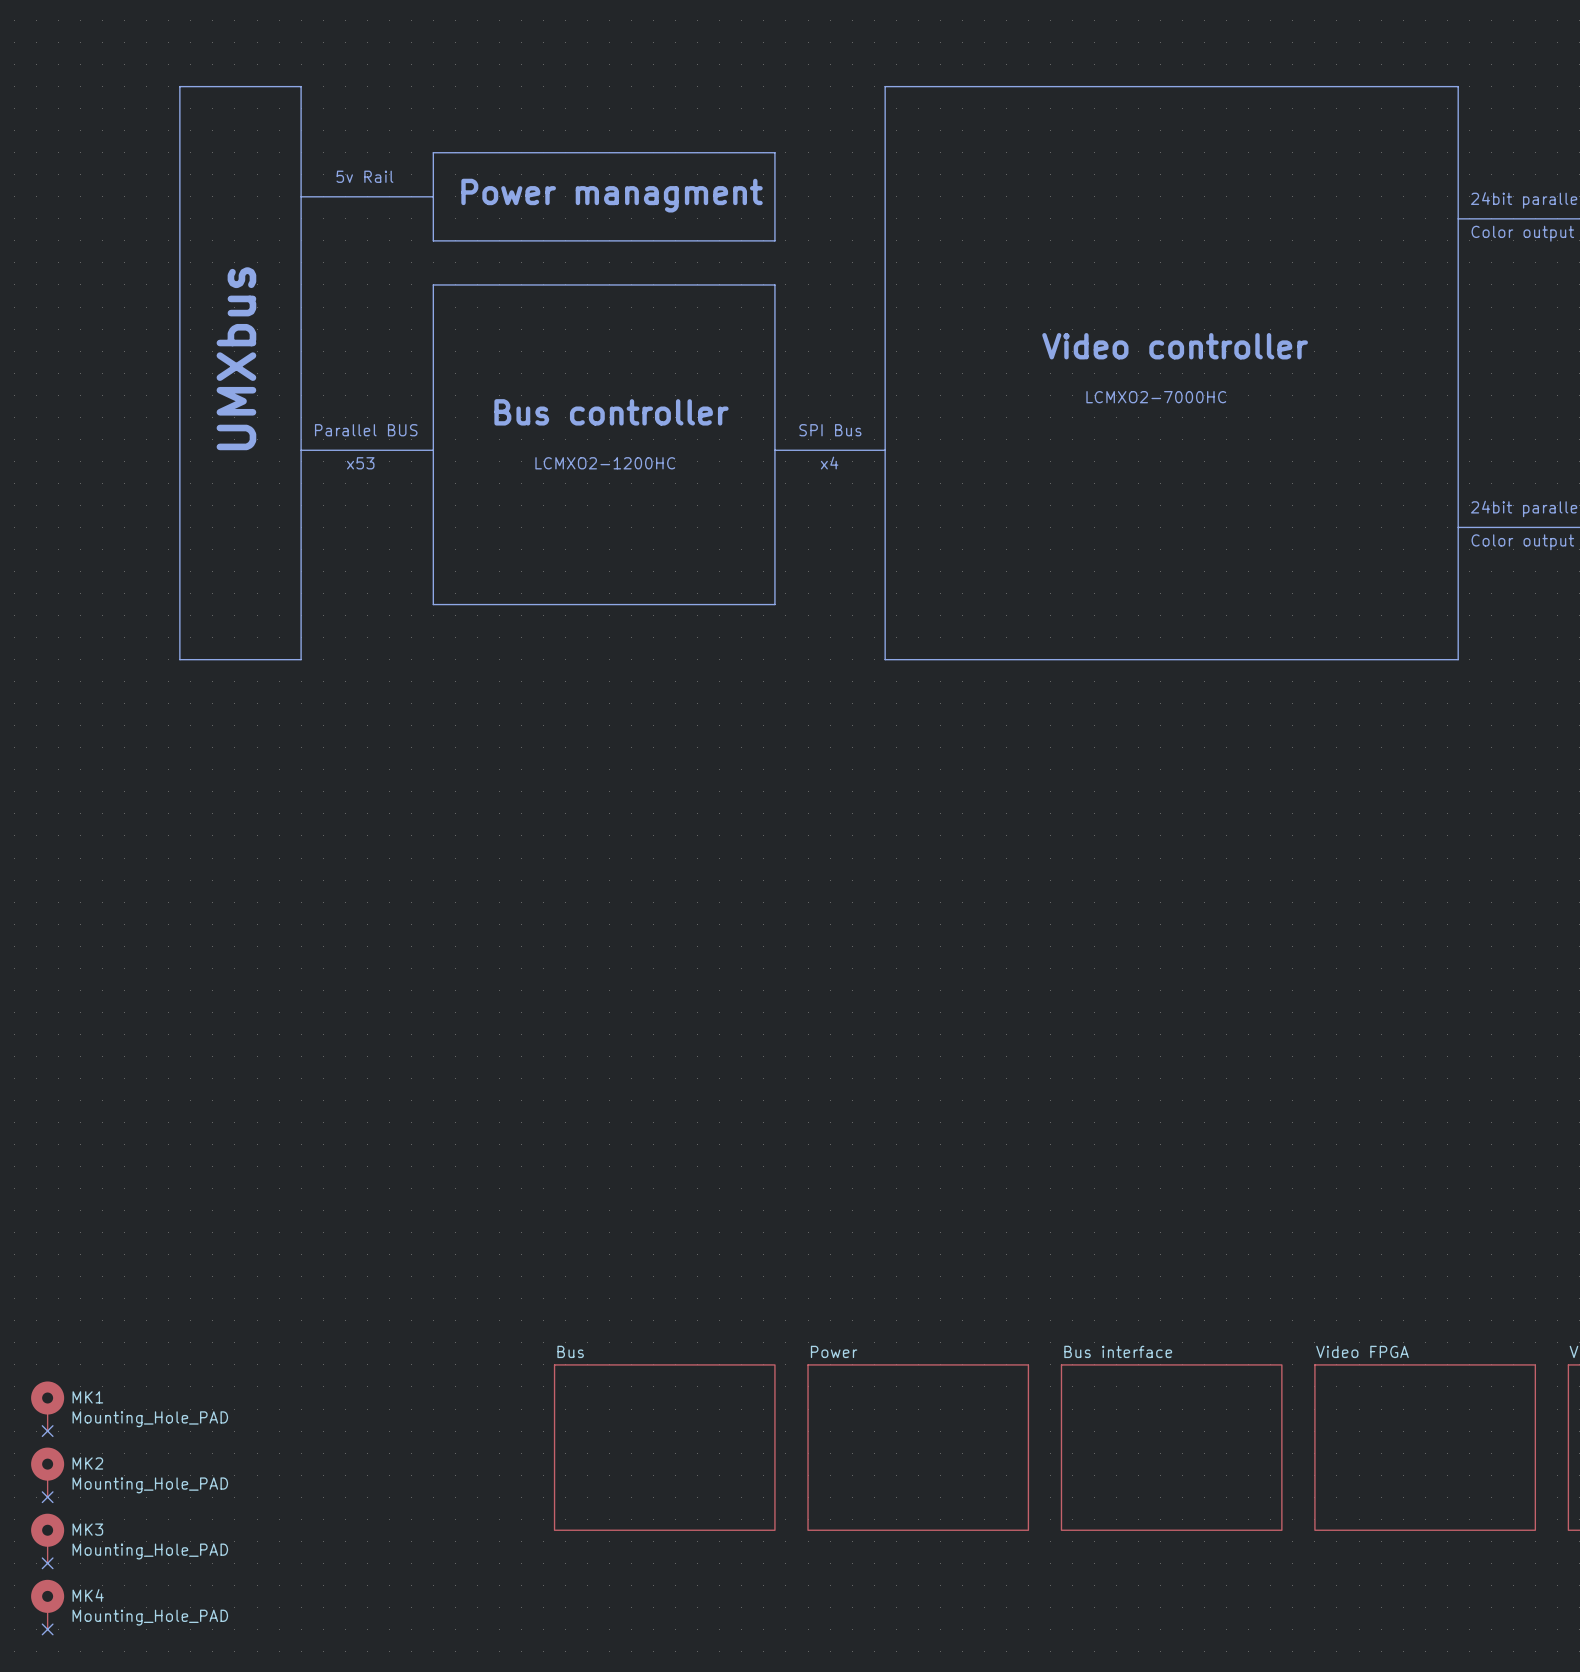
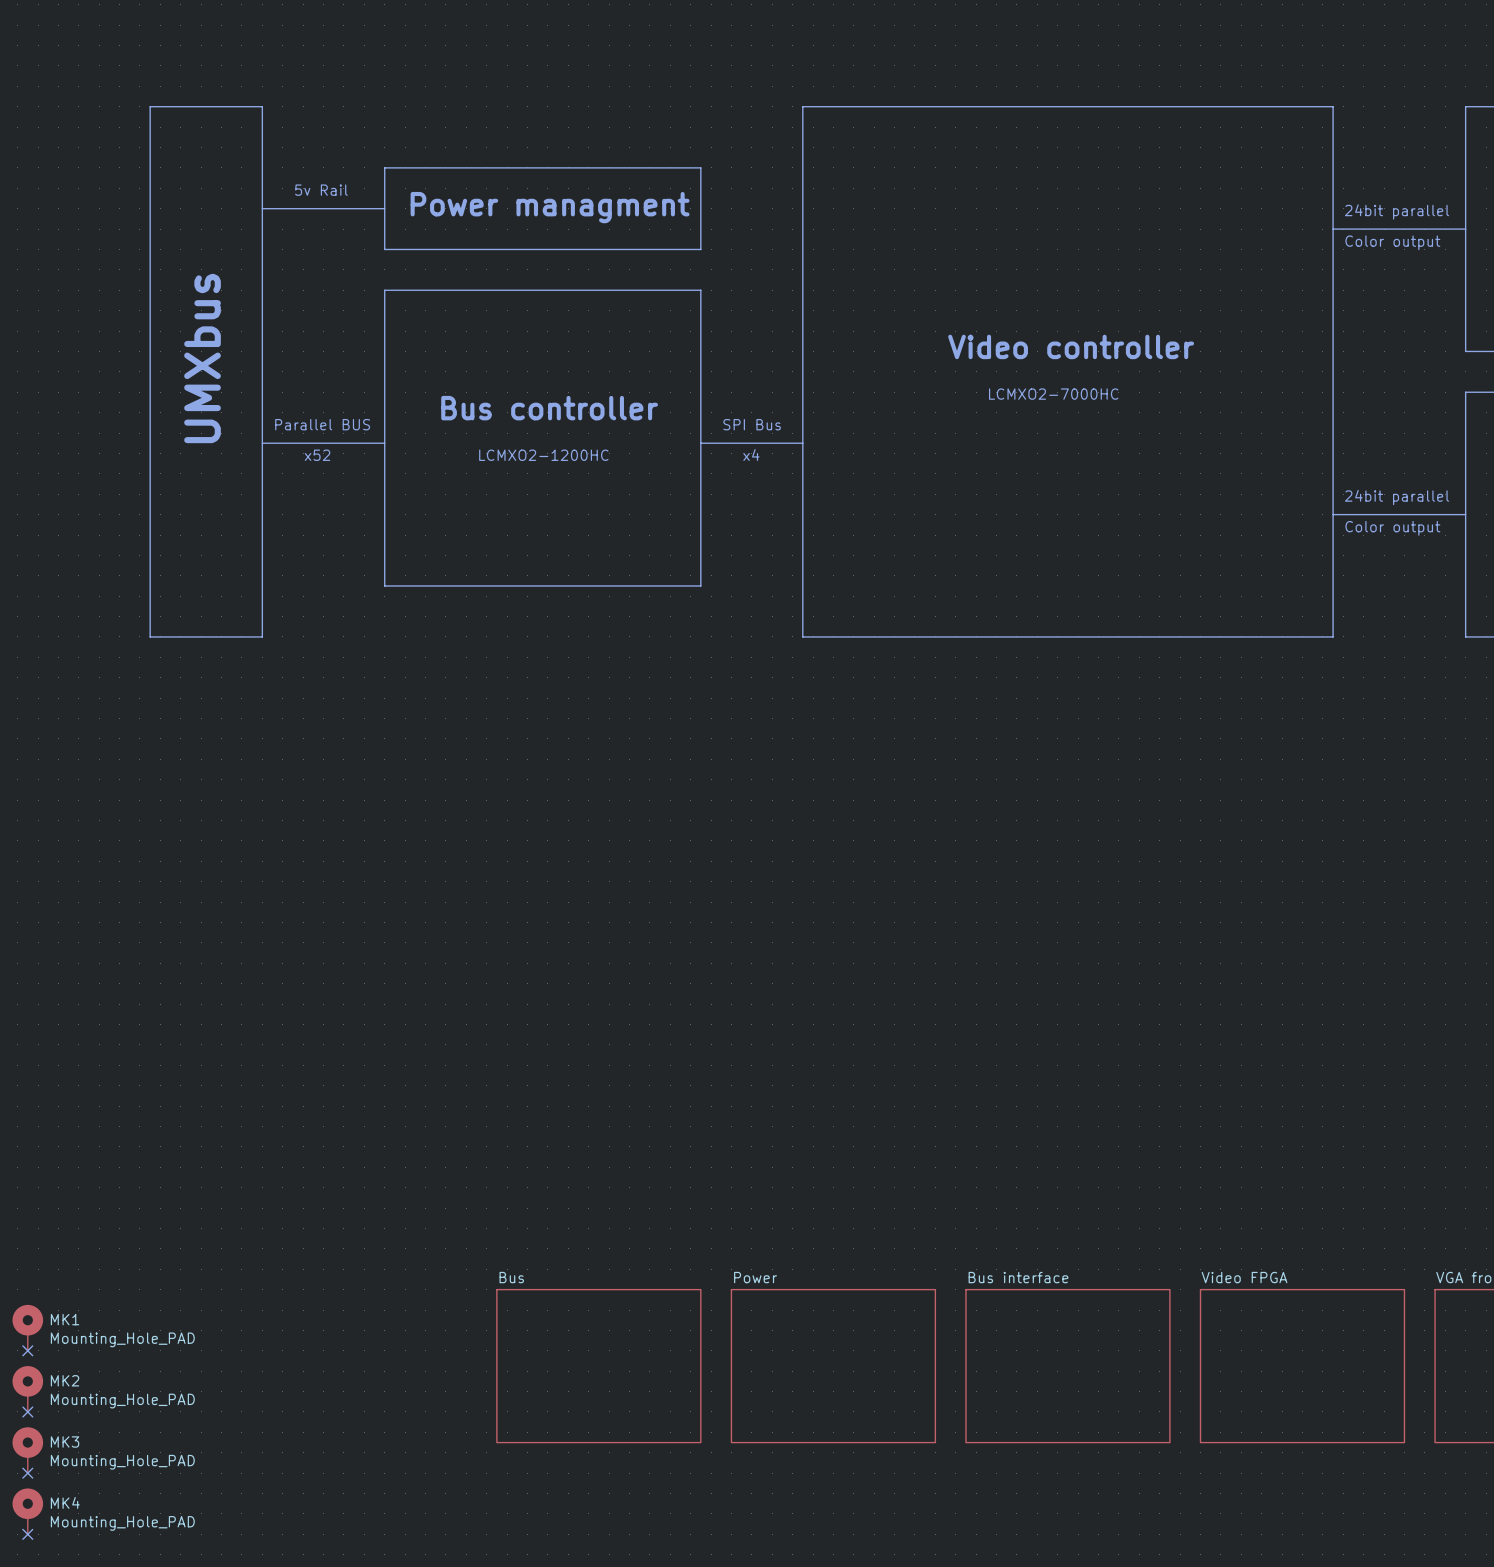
text: x53 (360, 463) -> x52 (317, 455)

